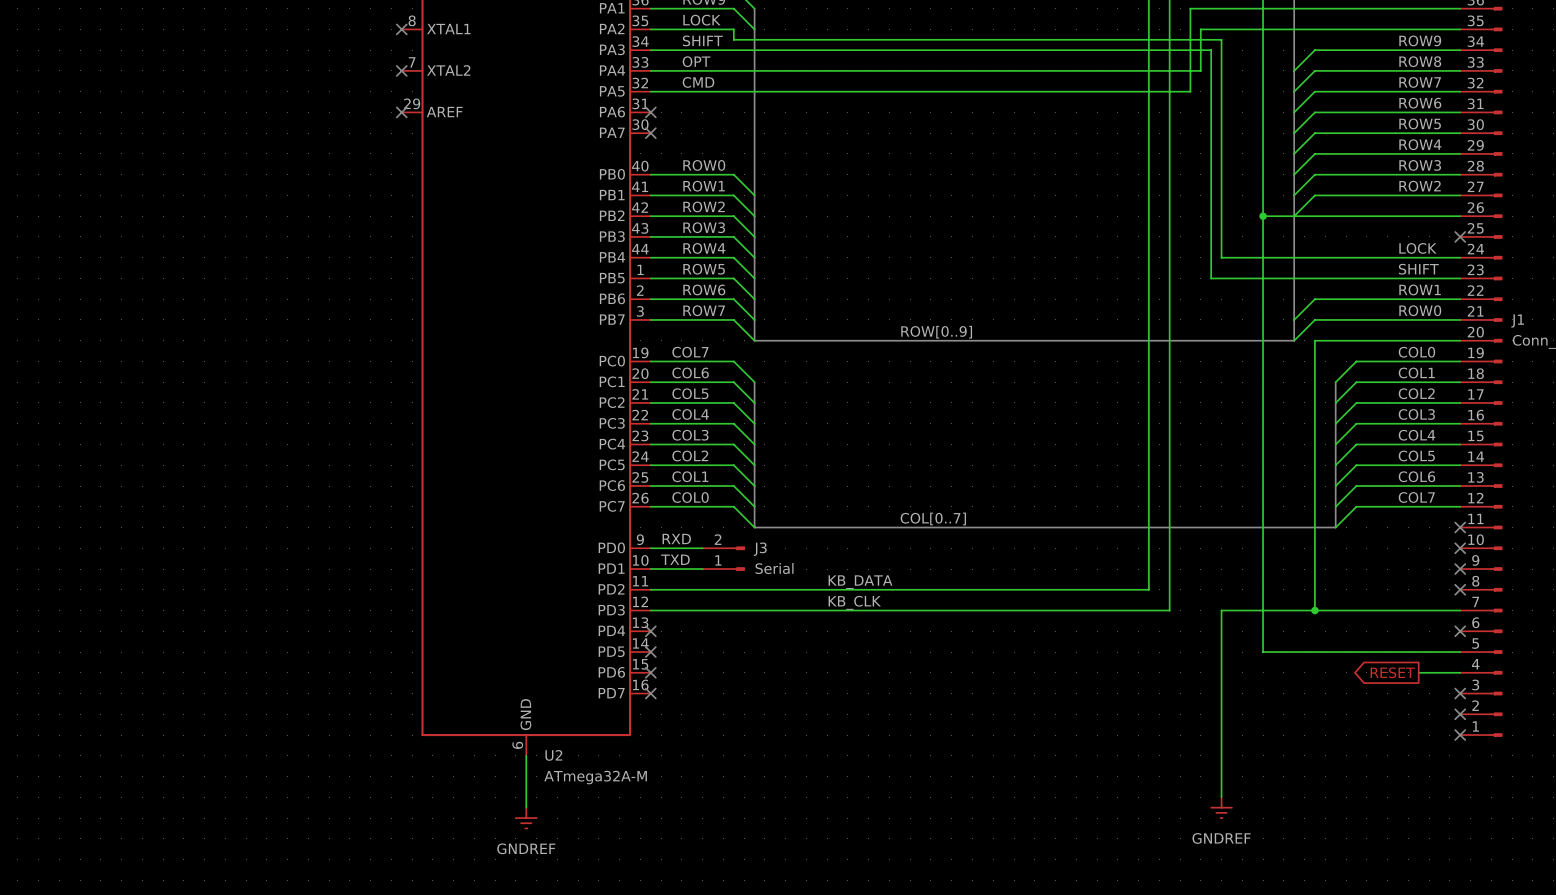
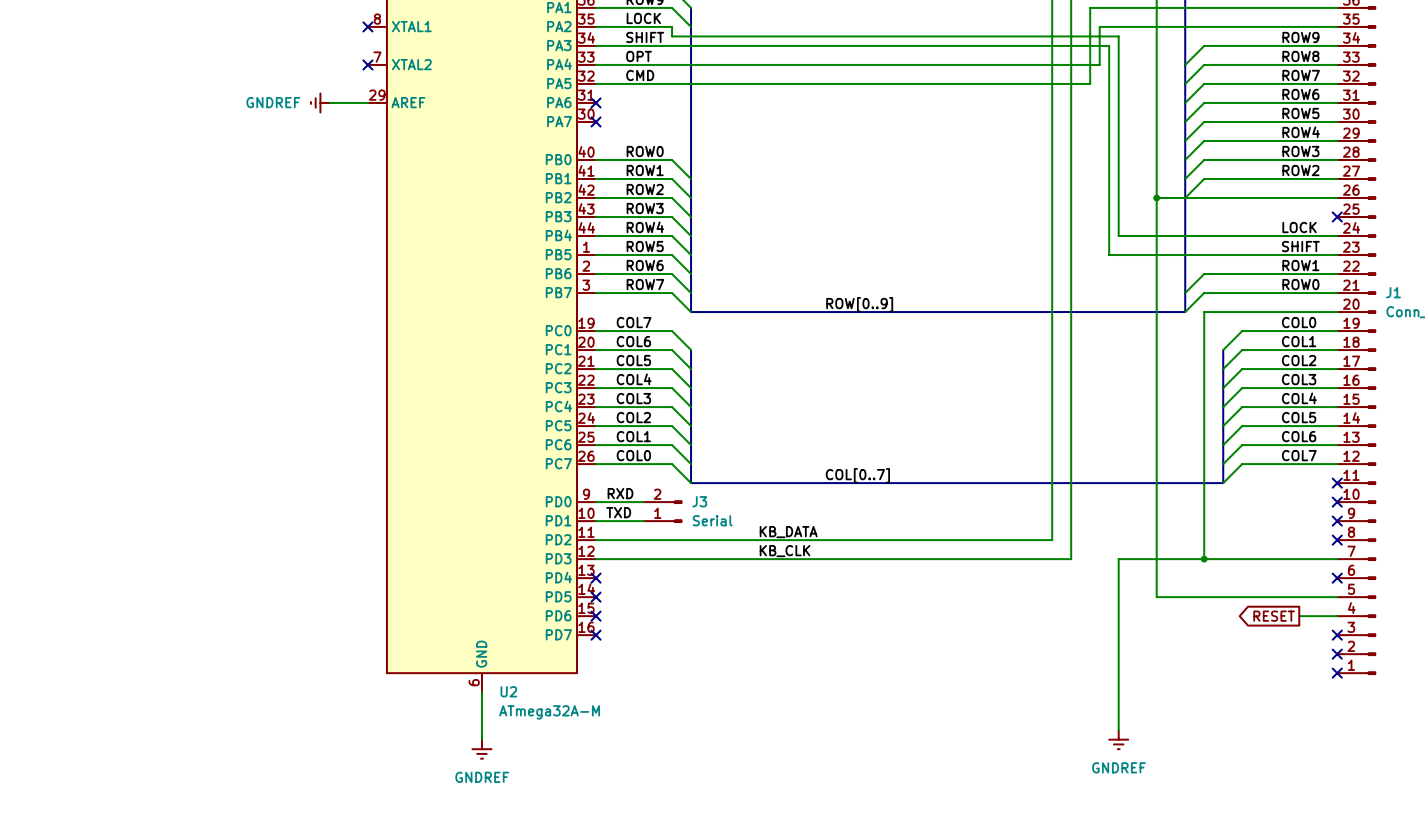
power symbol: none -> GNDREF (320, 102)
wire: none -> (329, 102) (367, 102)
no-connect mark: (401, 112) -> none

